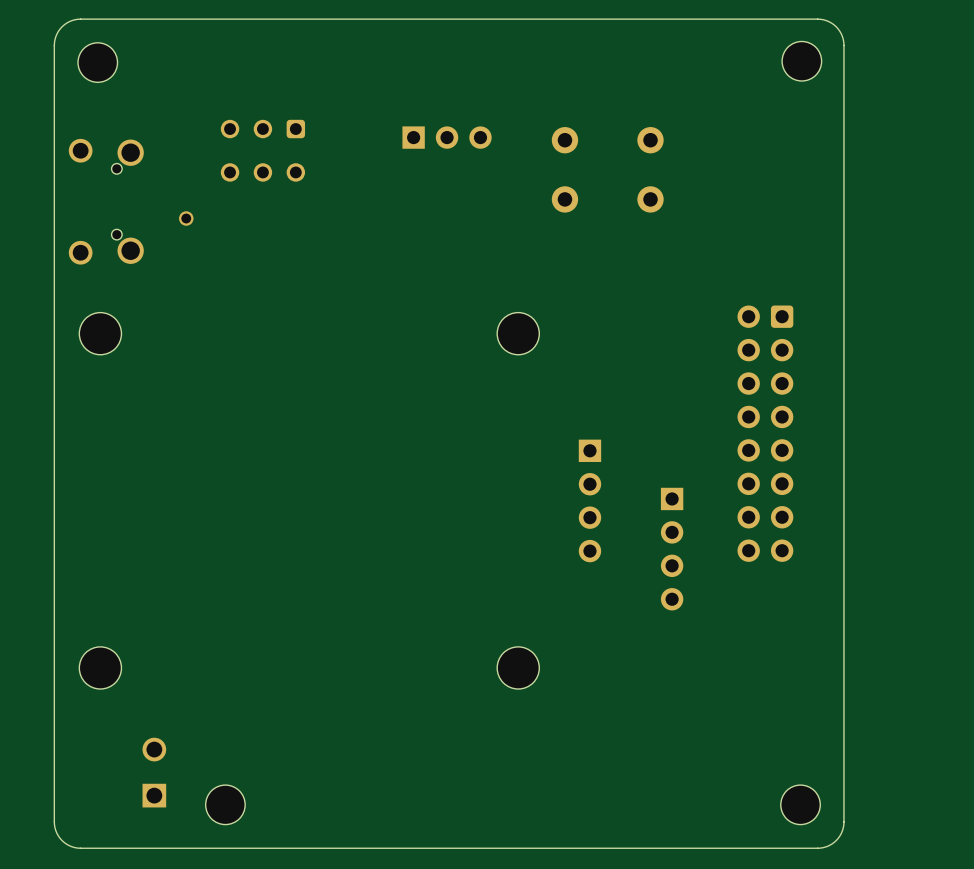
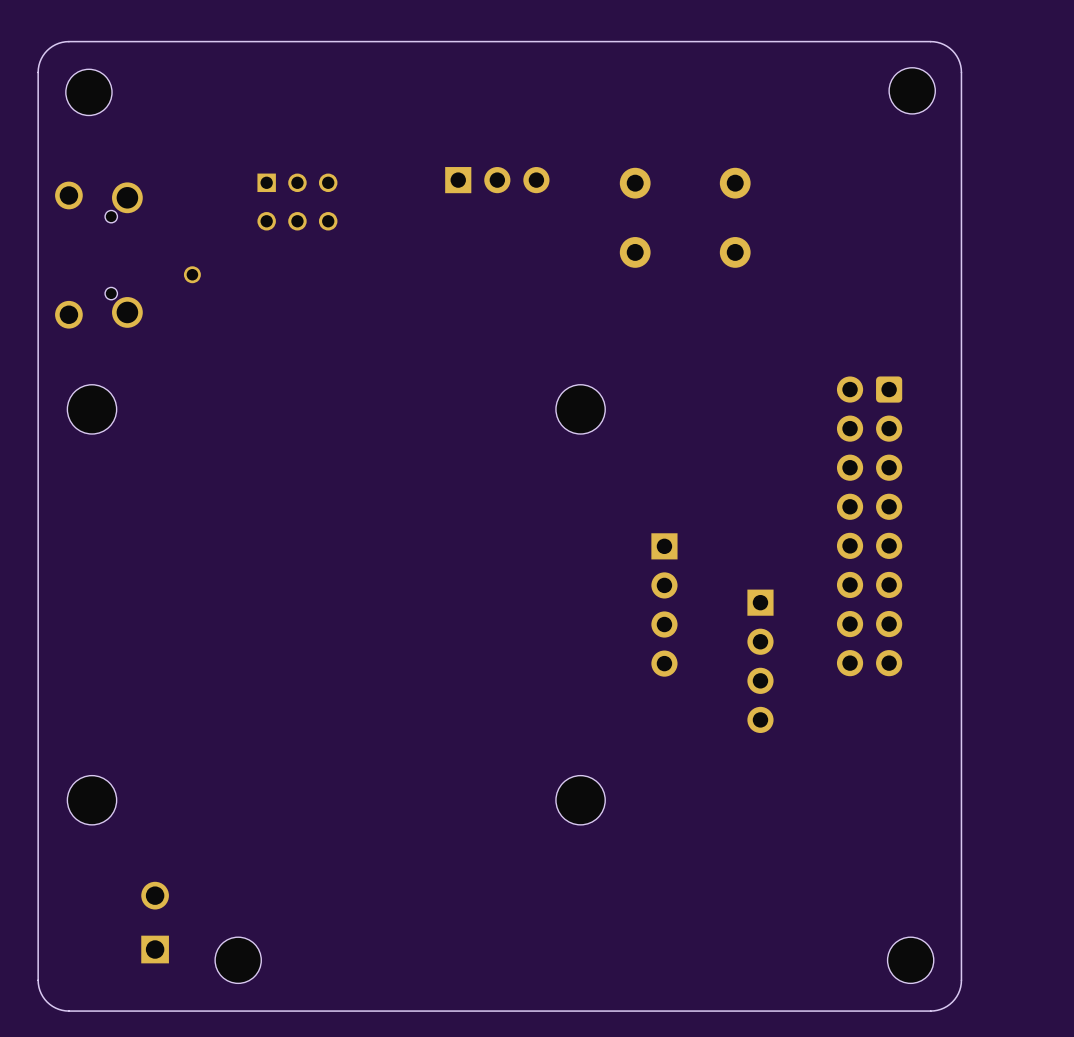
part: (262, 150) -> none
part: none -> (297, 202)

